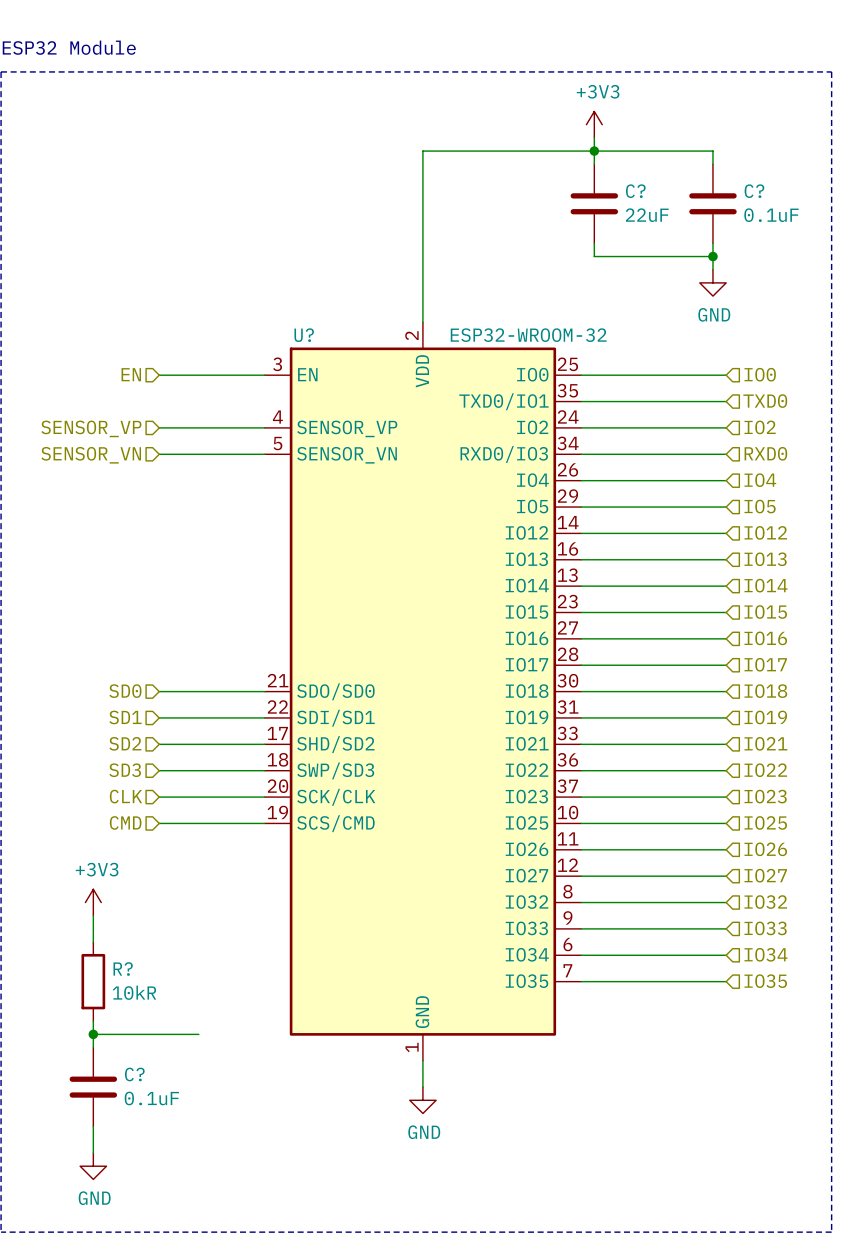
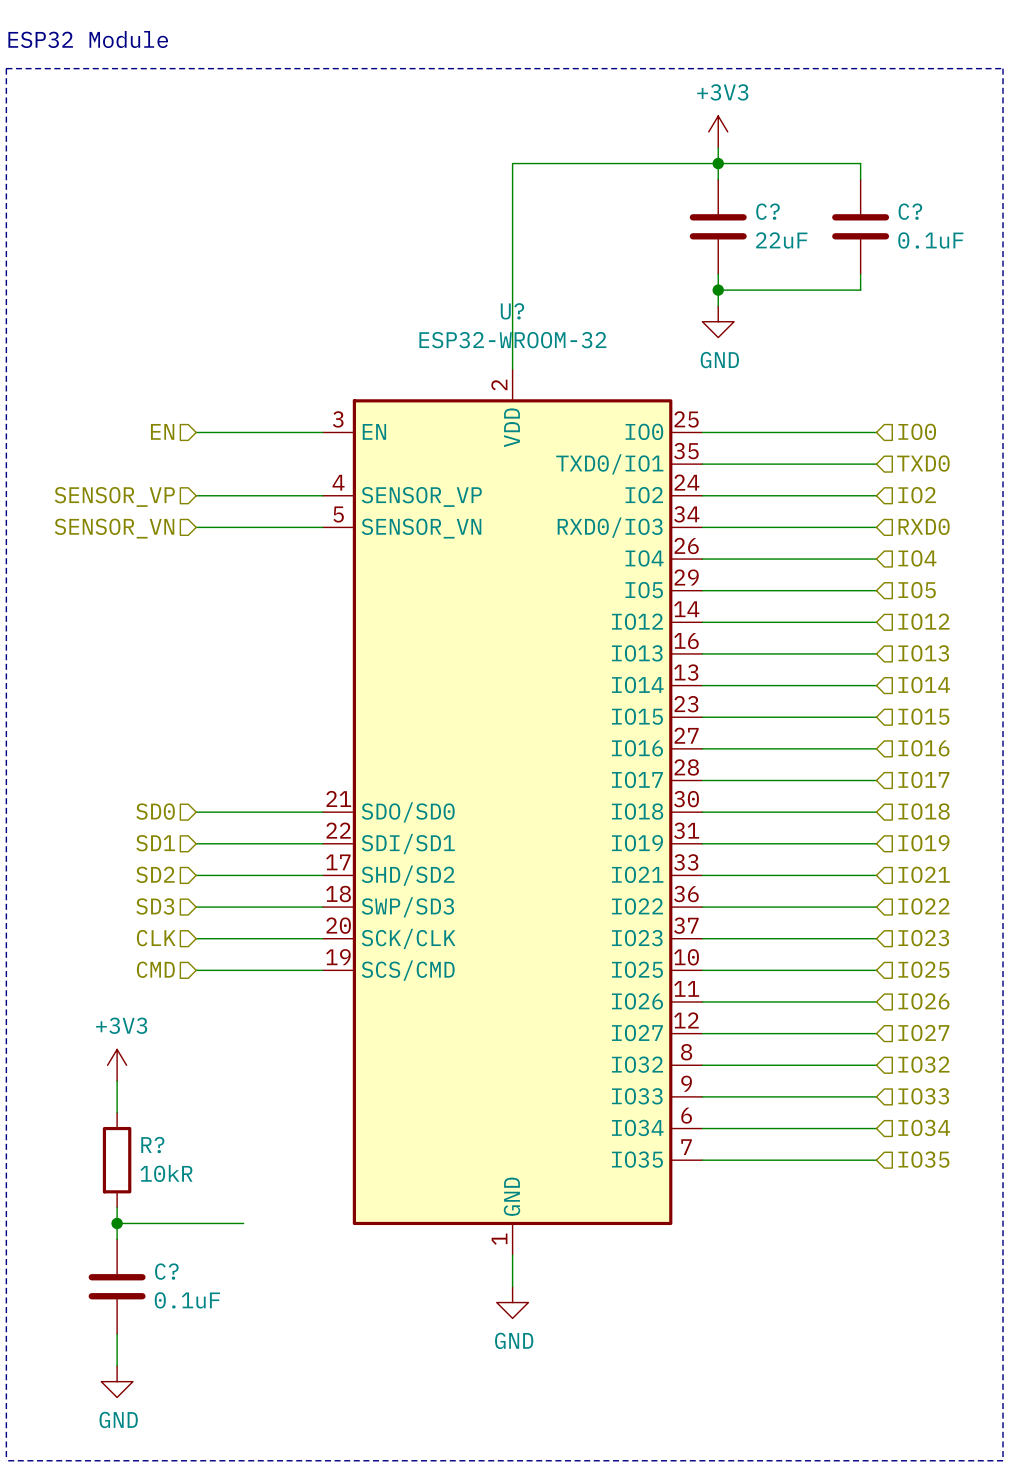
junction: none -> (718, 290)
wire: (712, 256) (712, 269) -> (718, 290) (718, 305)
junction: (712, 256) -> none
power symbol position: GND (712, 282) -> GND (718, 321)
U? name position: U? (304, 335) -> U? (512, 311)
U? value position: ESP32-WROOM-32 (528, 335) -> ESP32-WROOM-32 (512, 340)

